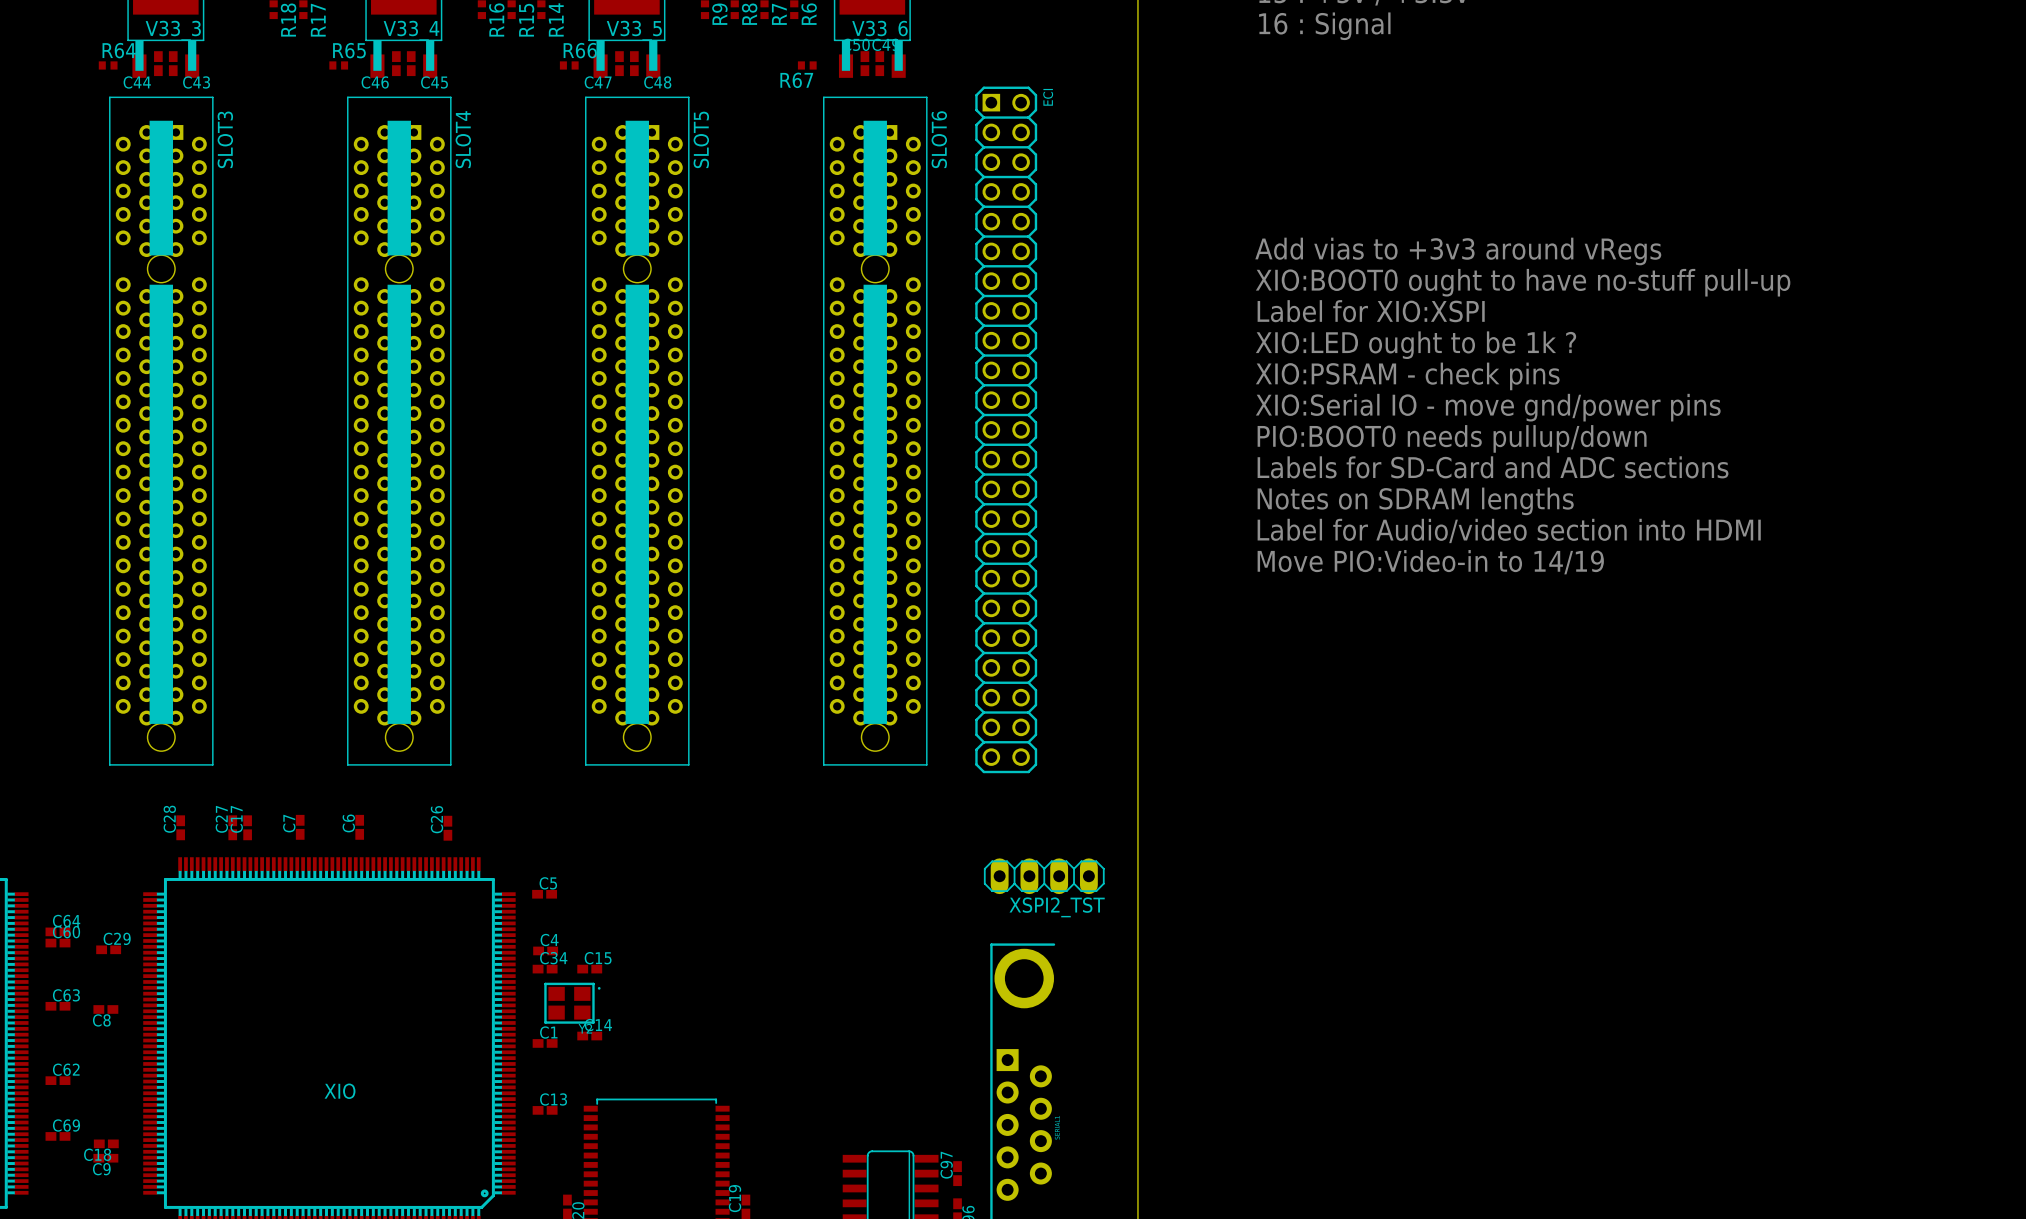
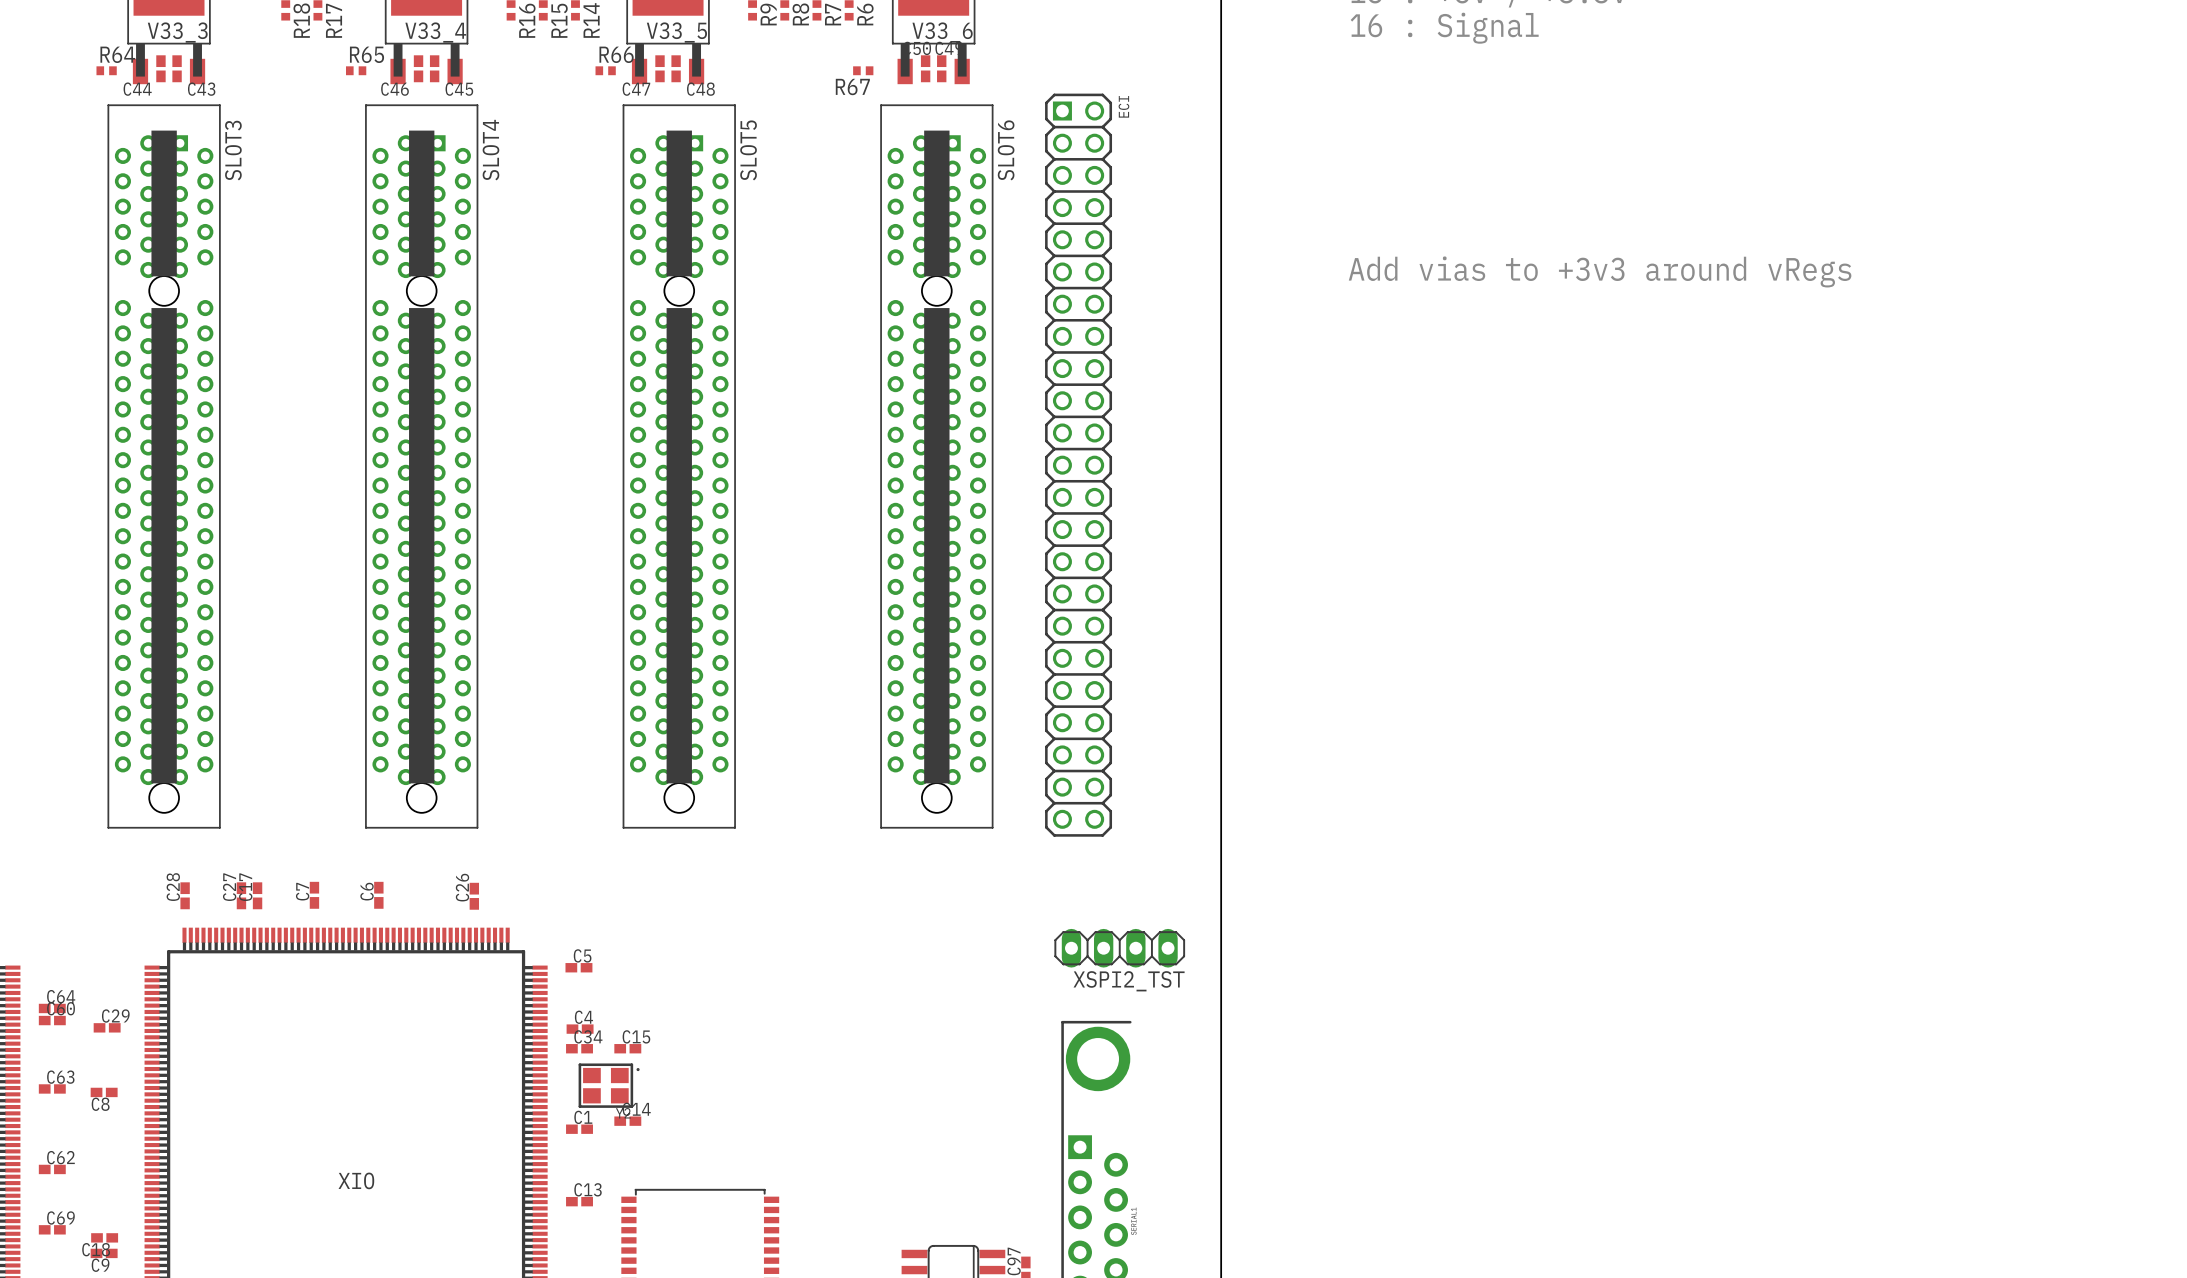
text: XIO:BOOT0 ought to have no-stuff pull-up (1523, 282) -> none
text: Label for XIO:XSPI (1371, 311) -> none
text: XIO:LED ought to be 1k ? (1416, 345) -> none
text: XIO:PSRAM - check pins (1407, 376) -> none
text: XIO:Serial IO - move gnd/power pins (1488, 407) -> none
text: PIO:BOOT0 needs pullup/down (1452, 438) -> none
text: Labels for SD-Card and ADC sections (1493, 467) -> none
text: Notes on SDRAM lengths (1415, 501) -> none
text: Label for Audio/video section into HDMI (1509, 530) -> none
text: Move PIO:Video-in to 14/19 (1430, 562) -> none

